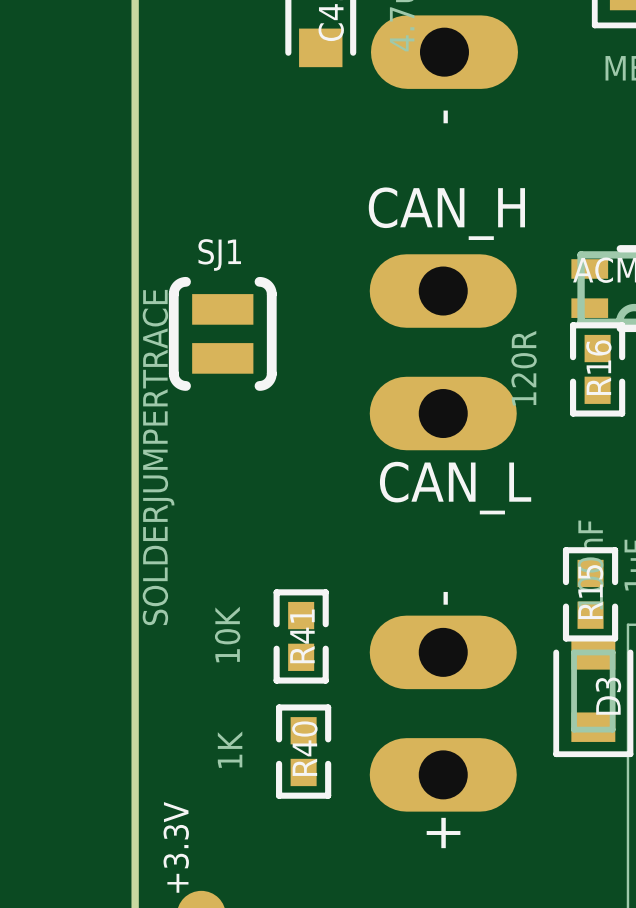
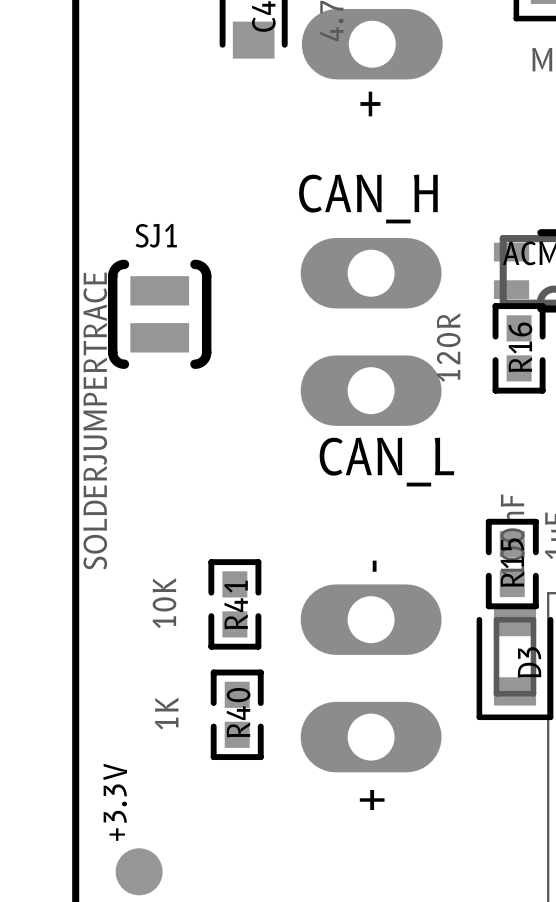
text: - (445, 116) -> + (370, 104)

